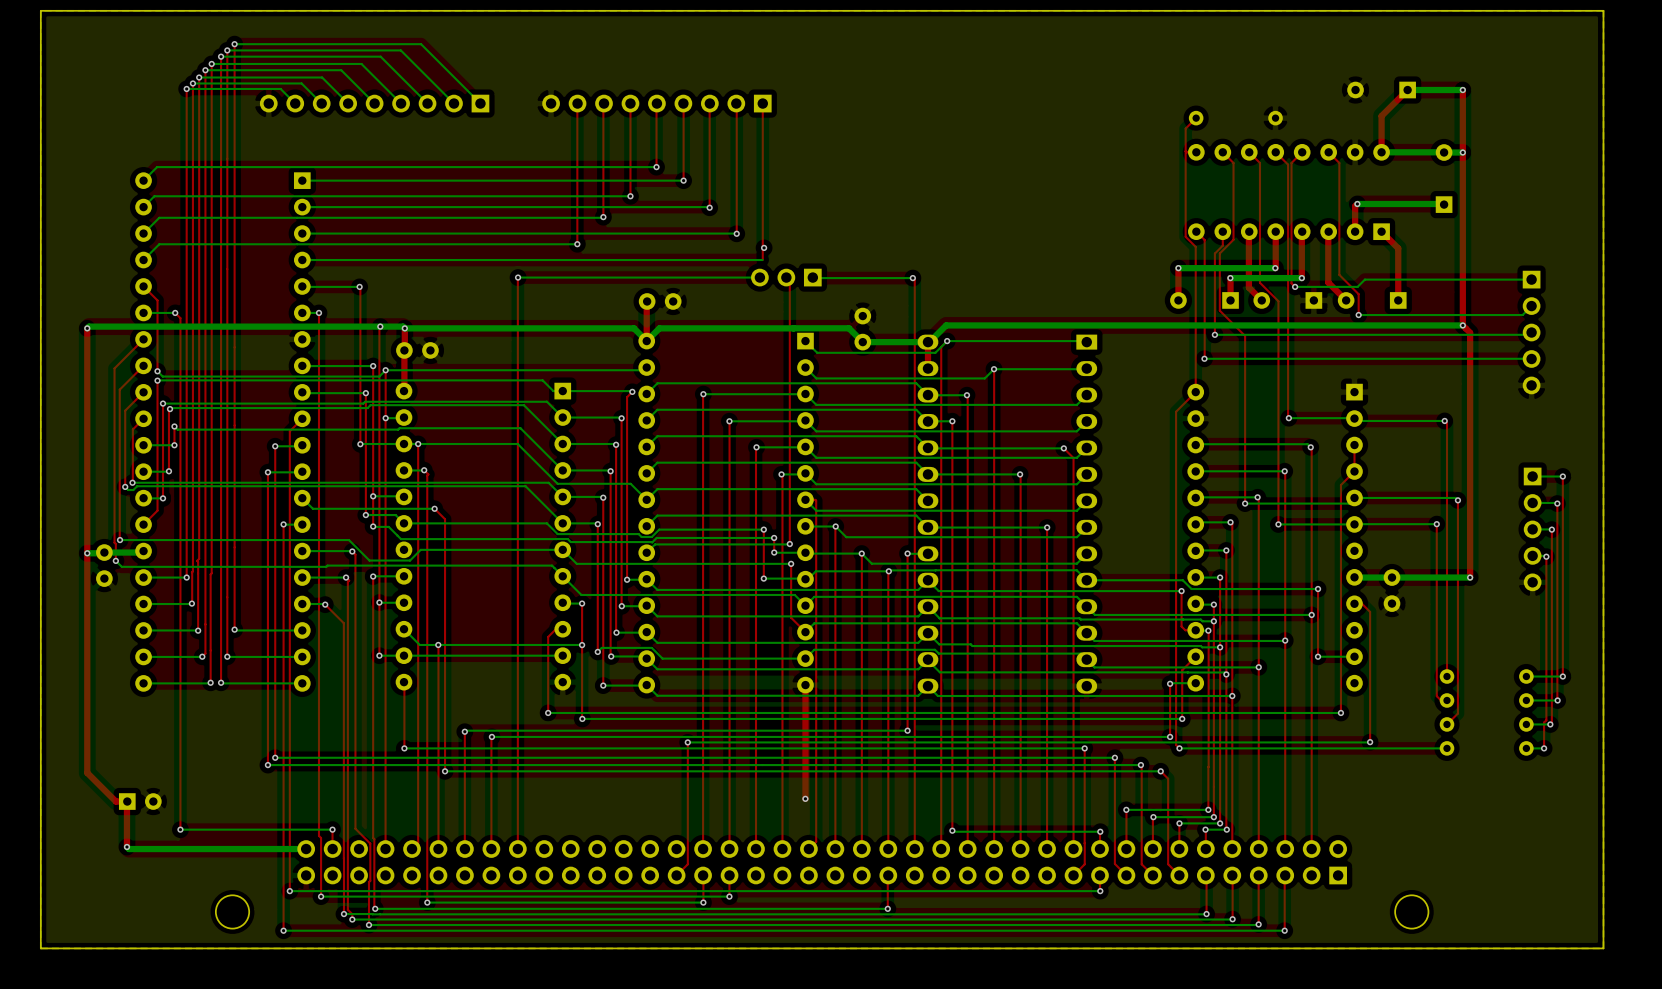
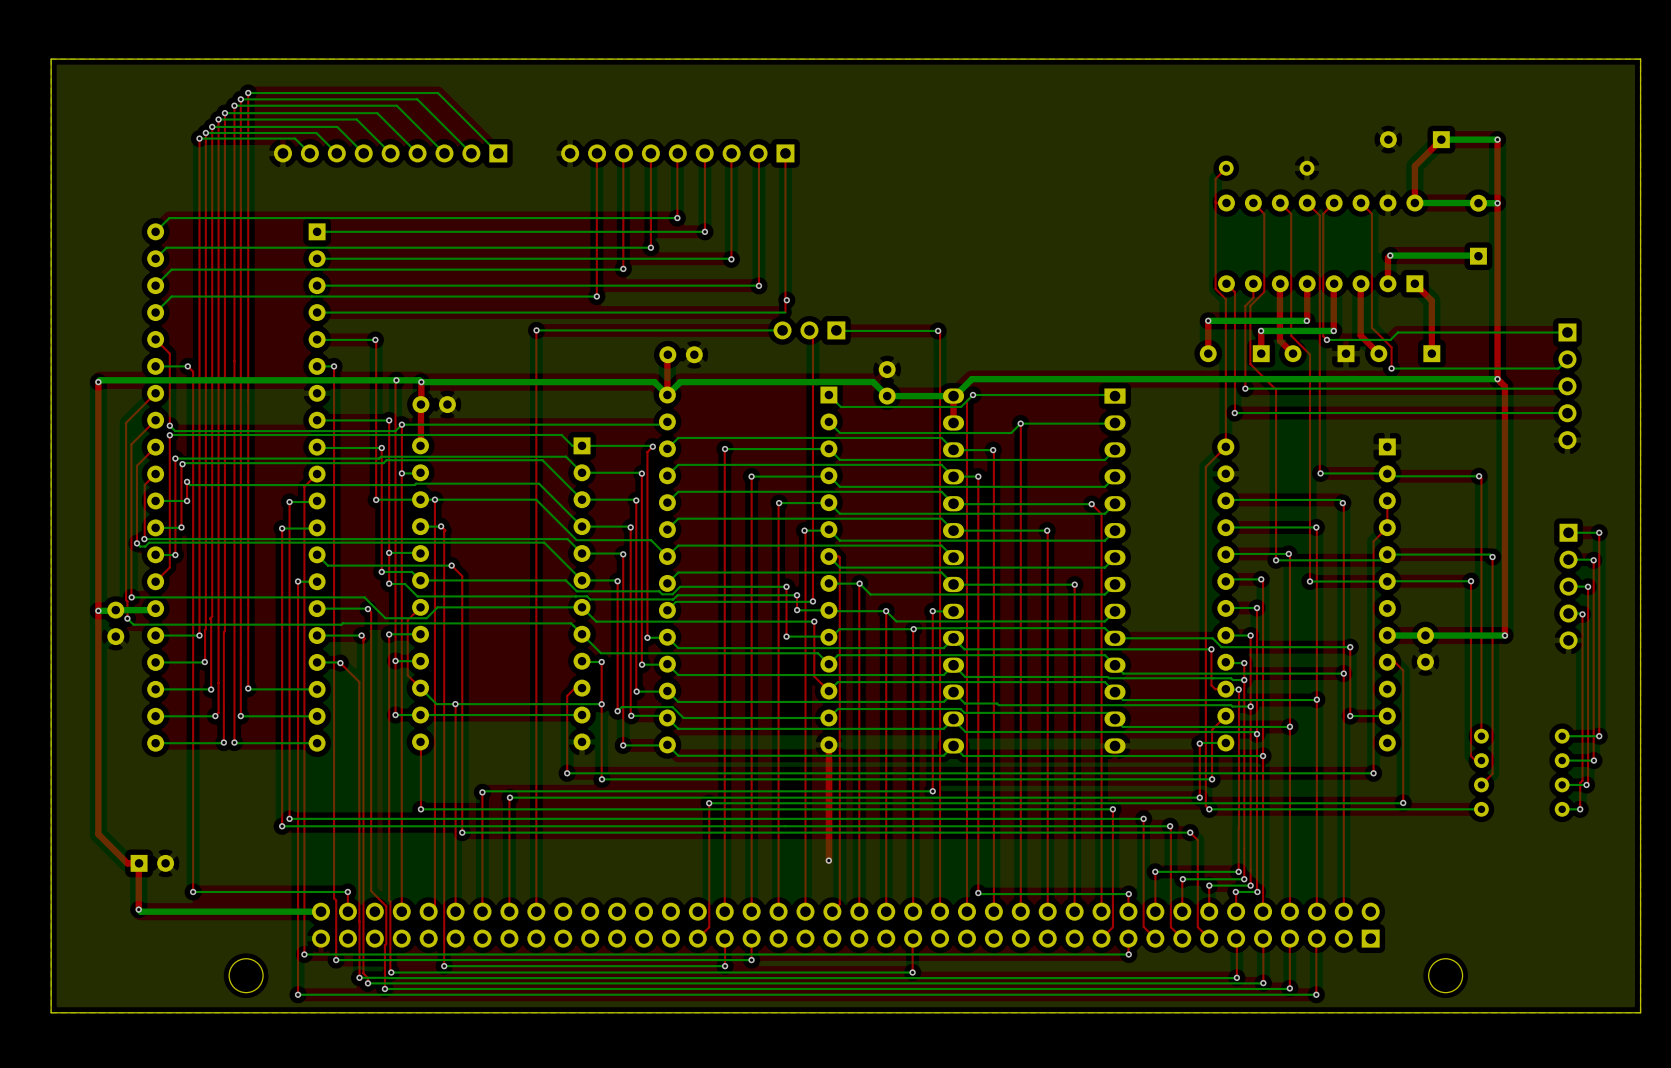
top track: none -> (420, 607) (407, 620) (407, 675) (420, 688)

